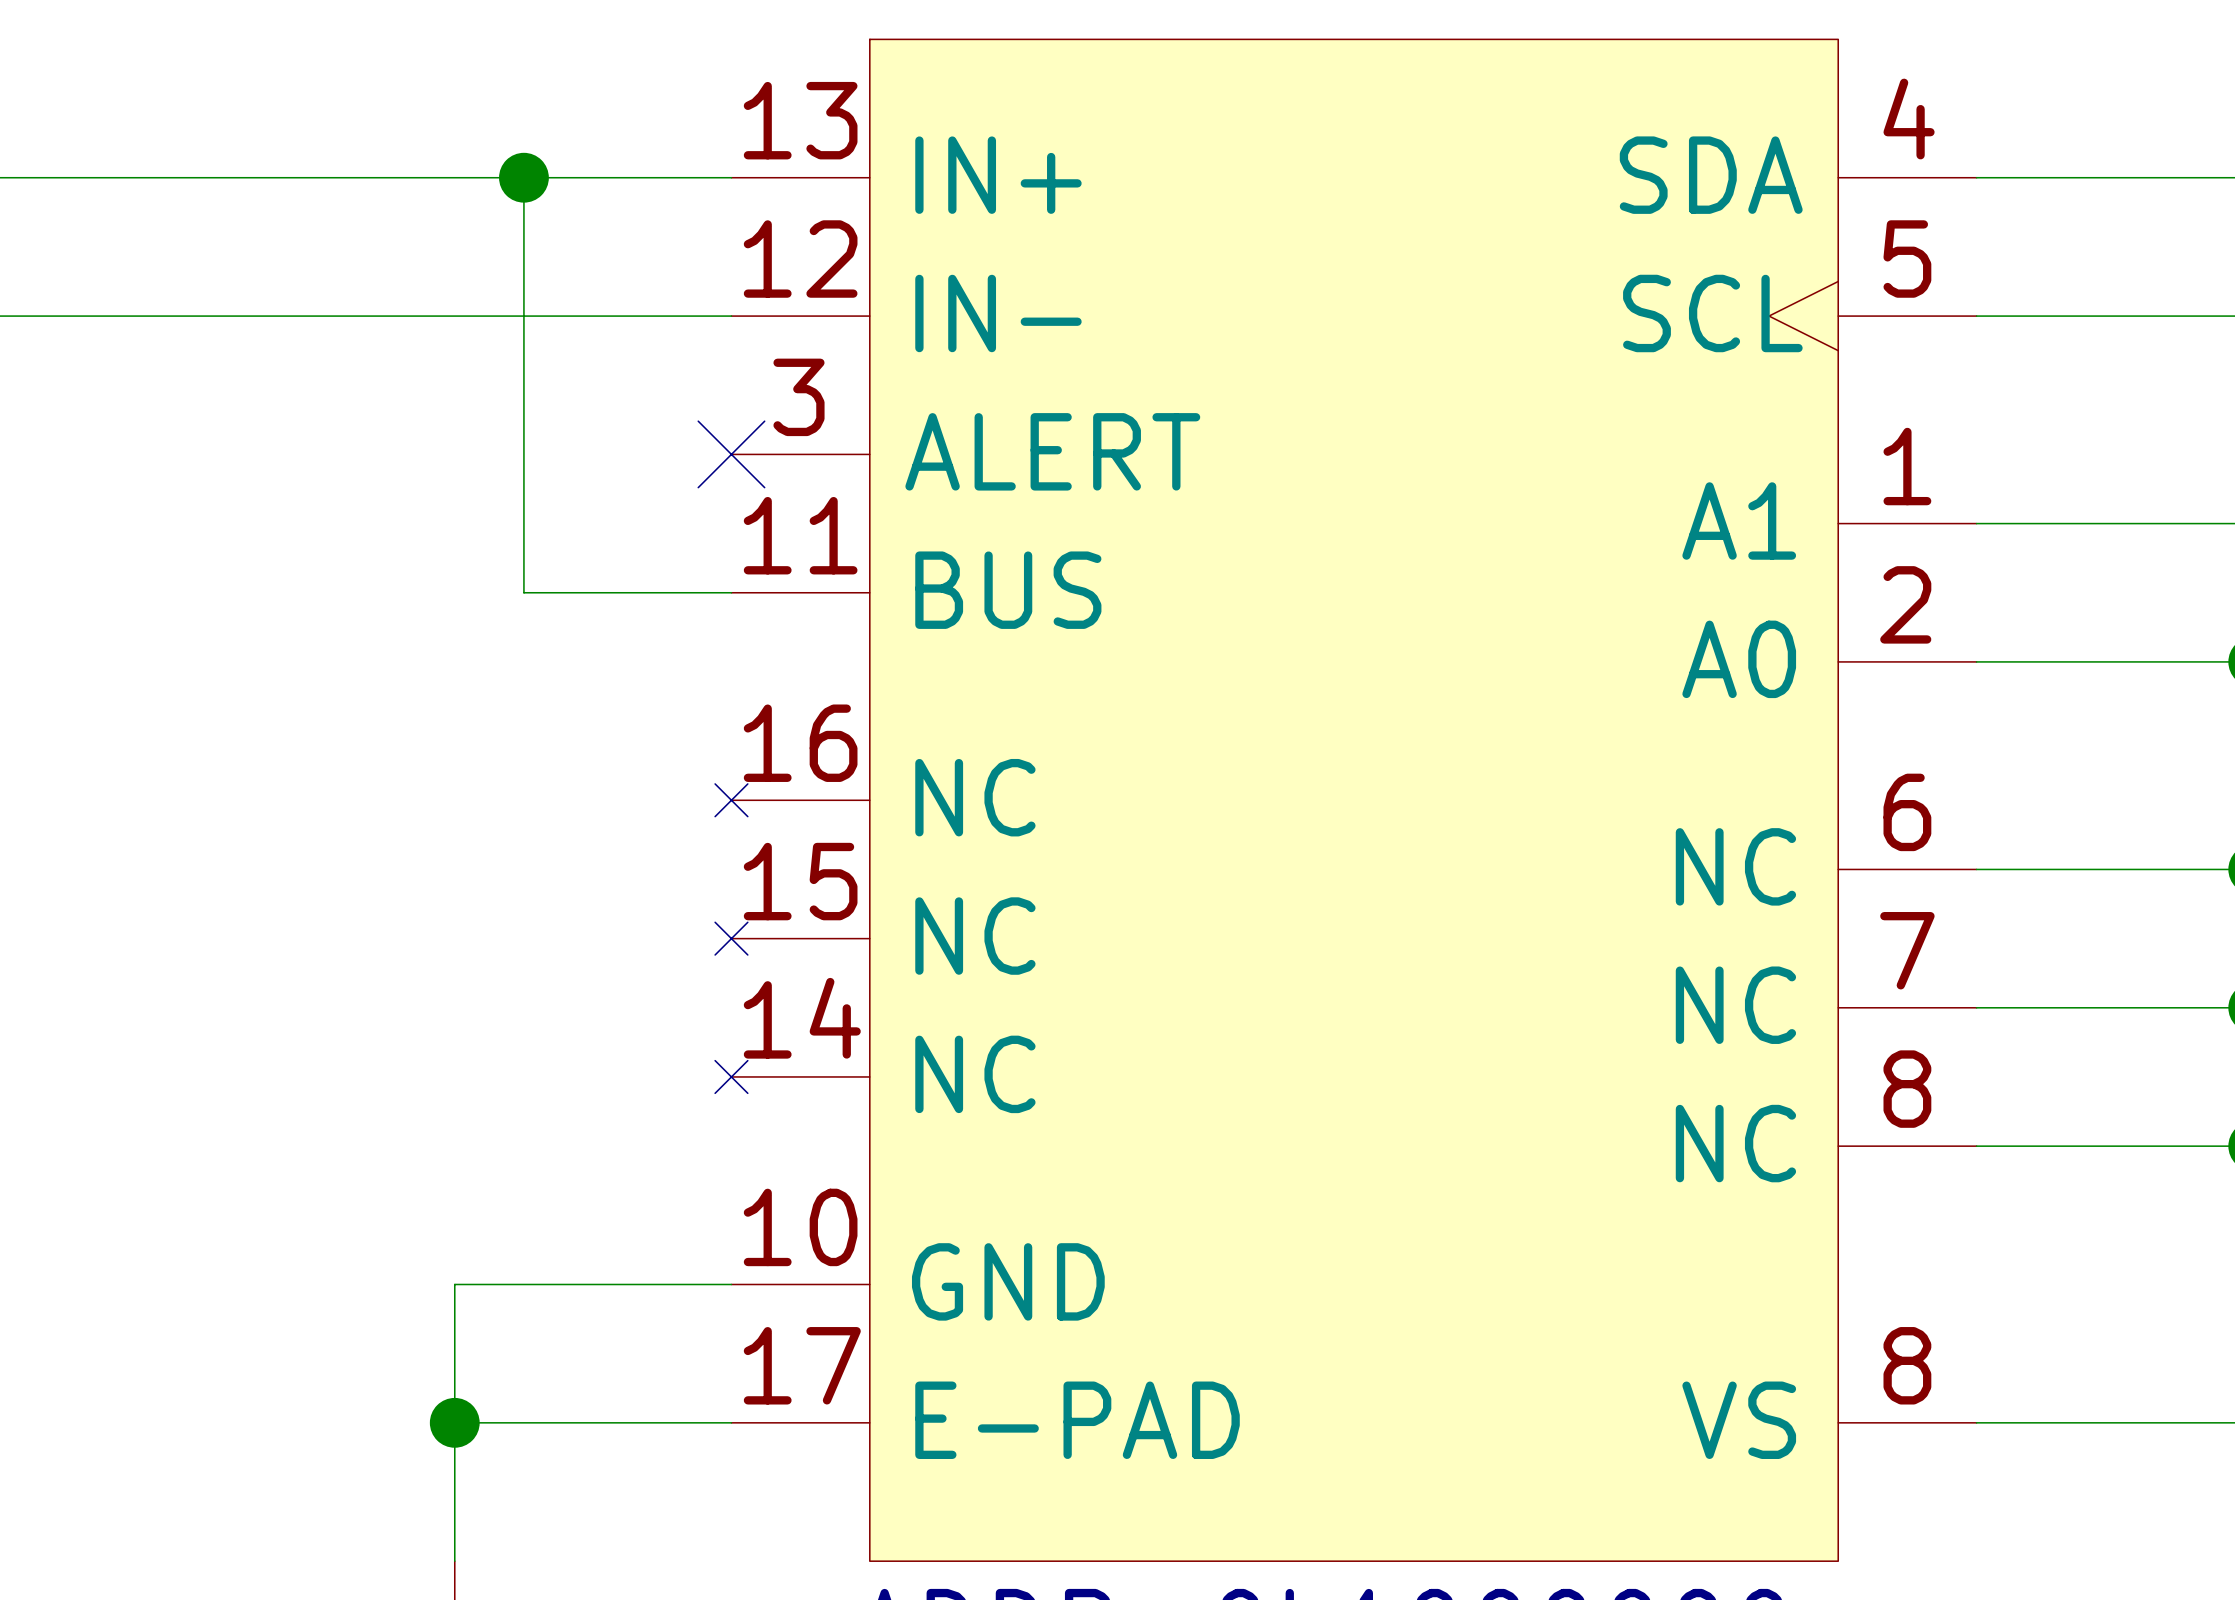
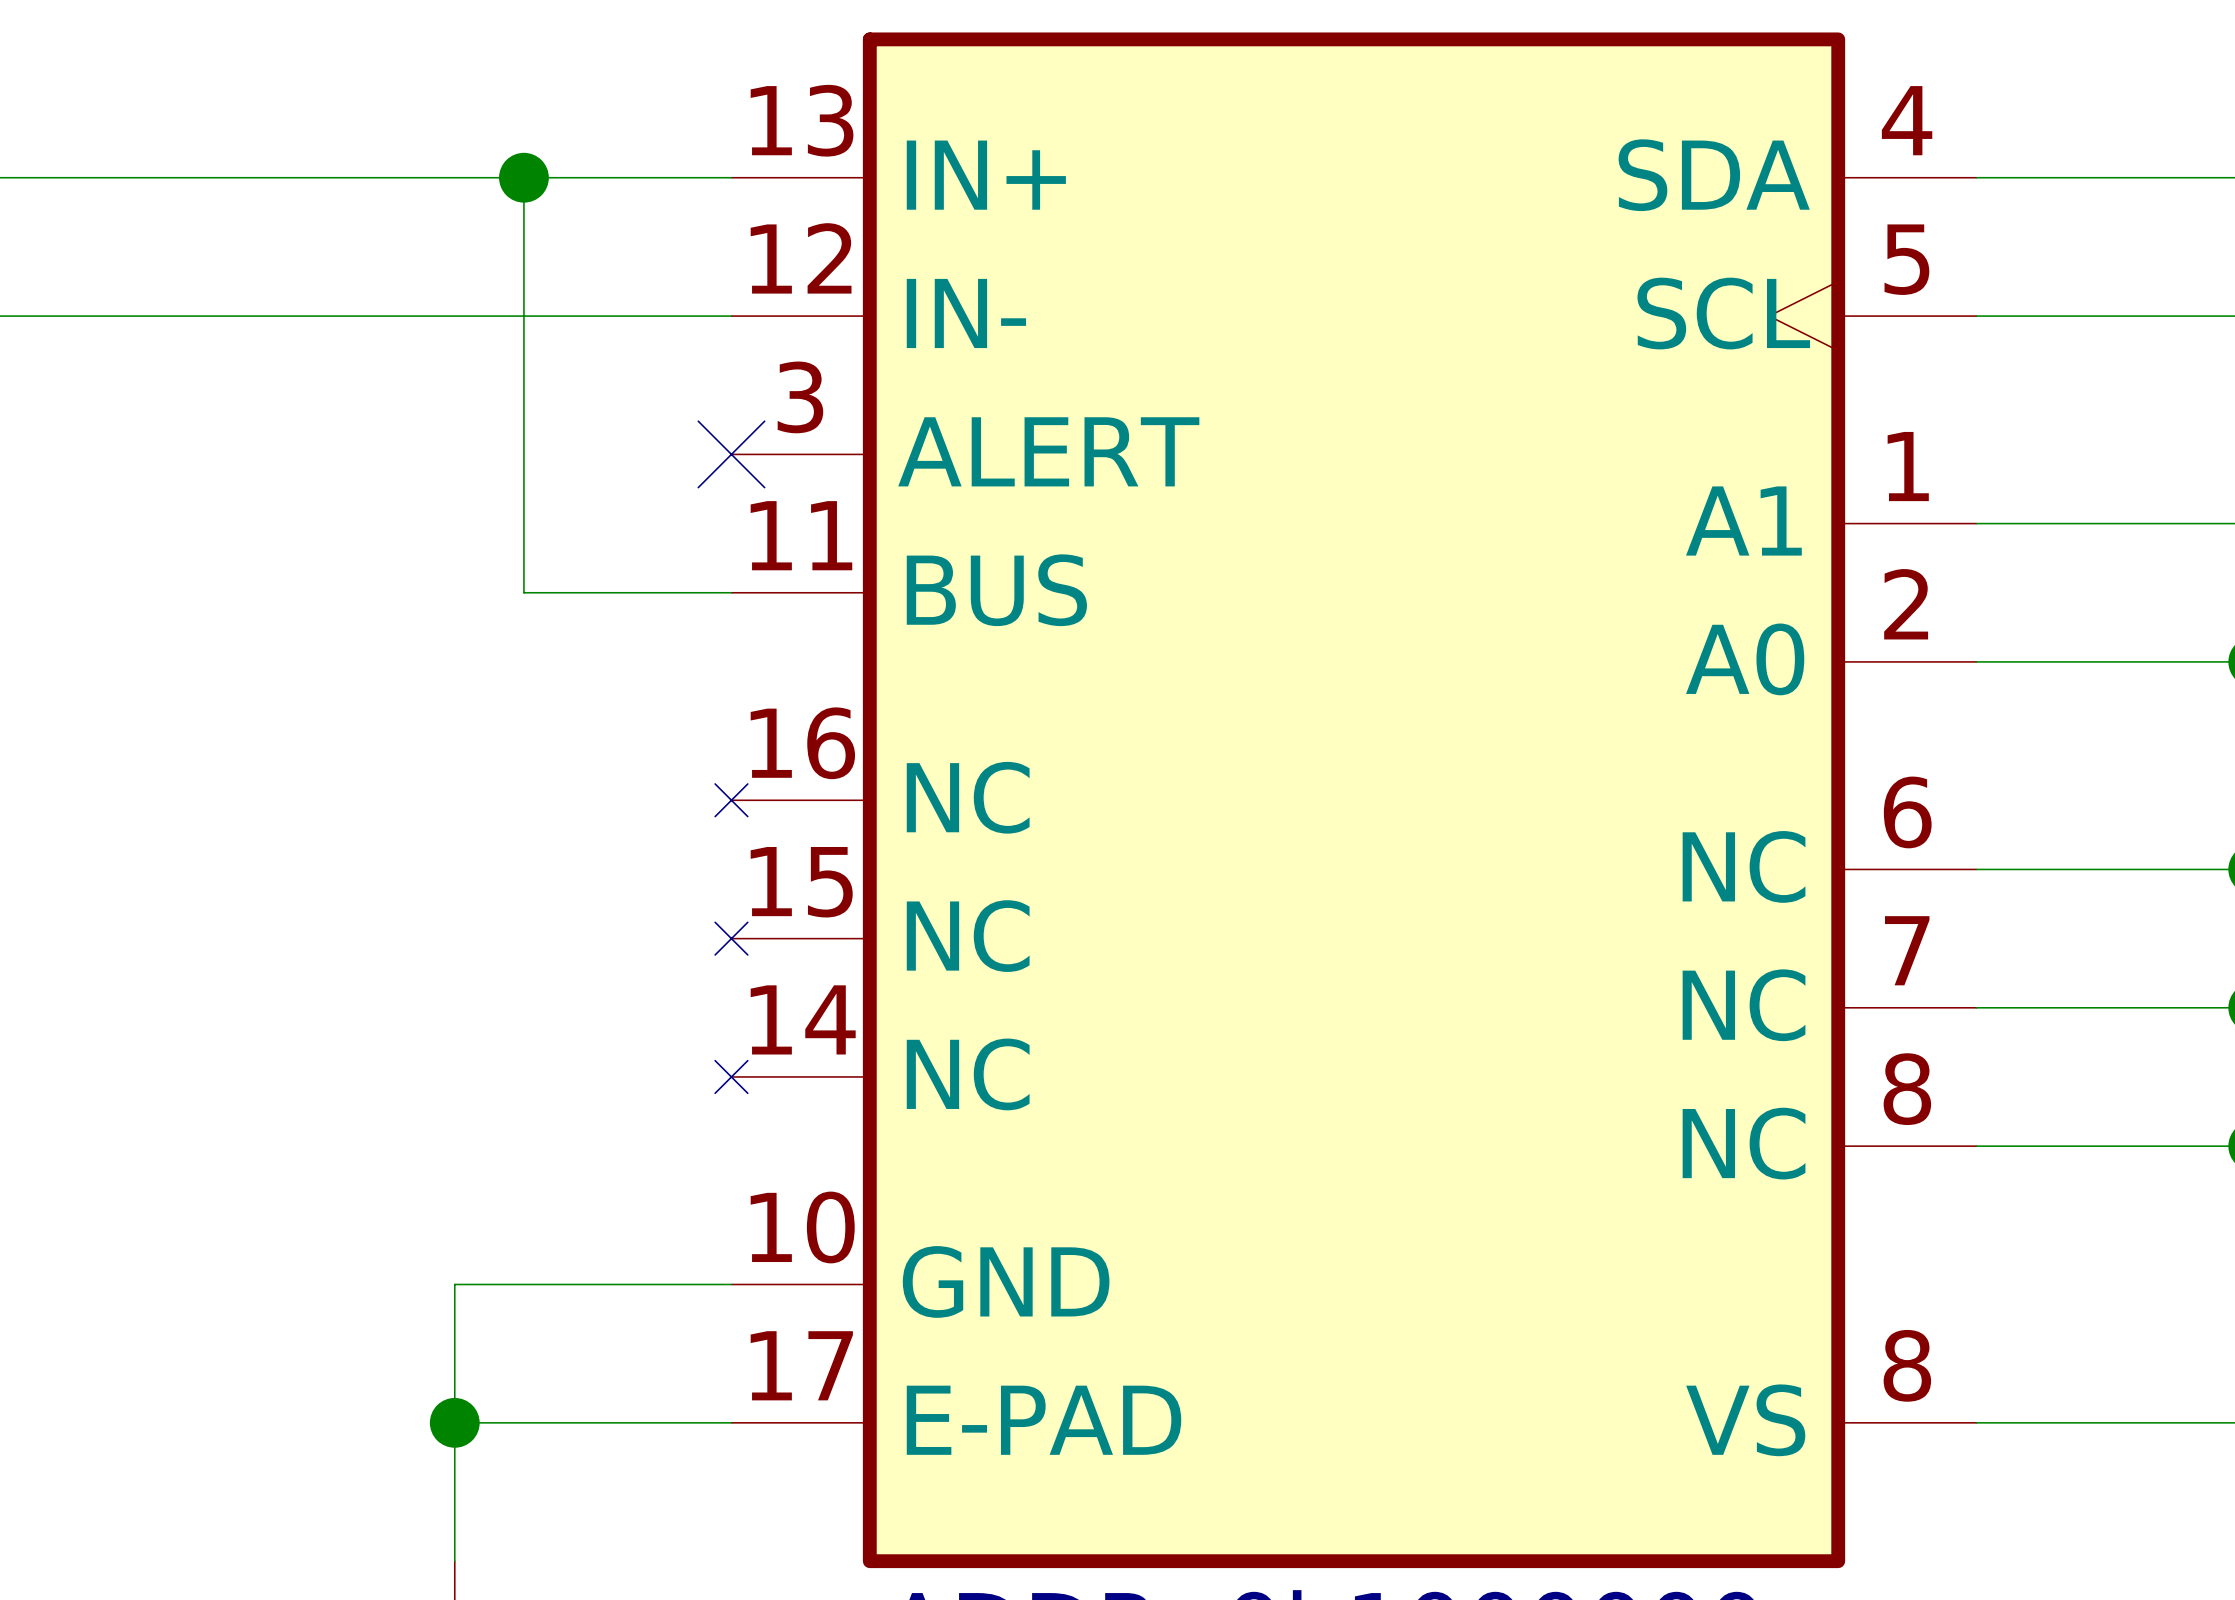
part symbol: [715, 39, 1977, 1562] -> [715, 32, 1977, 1569]

